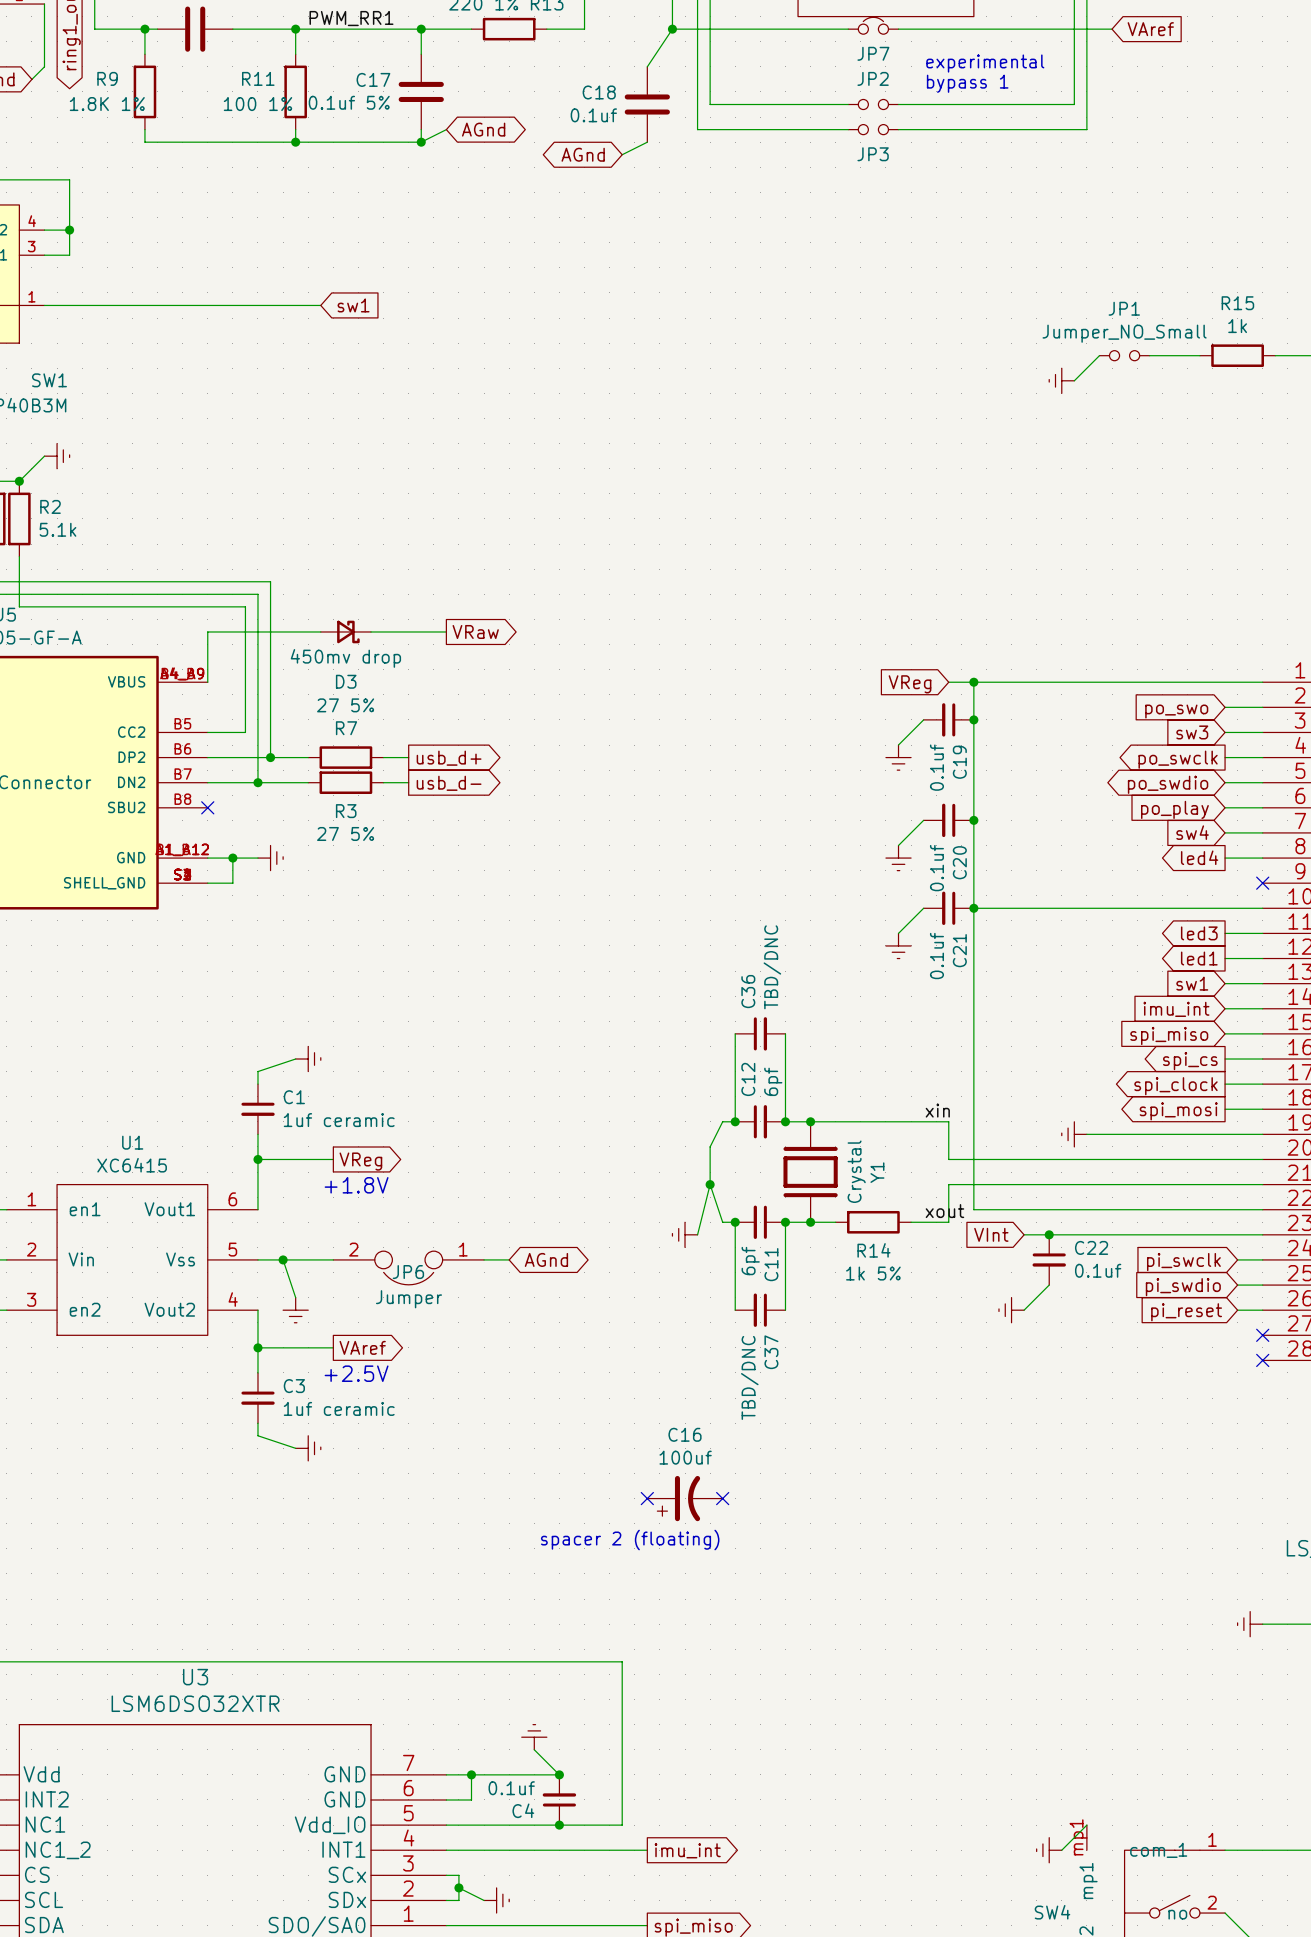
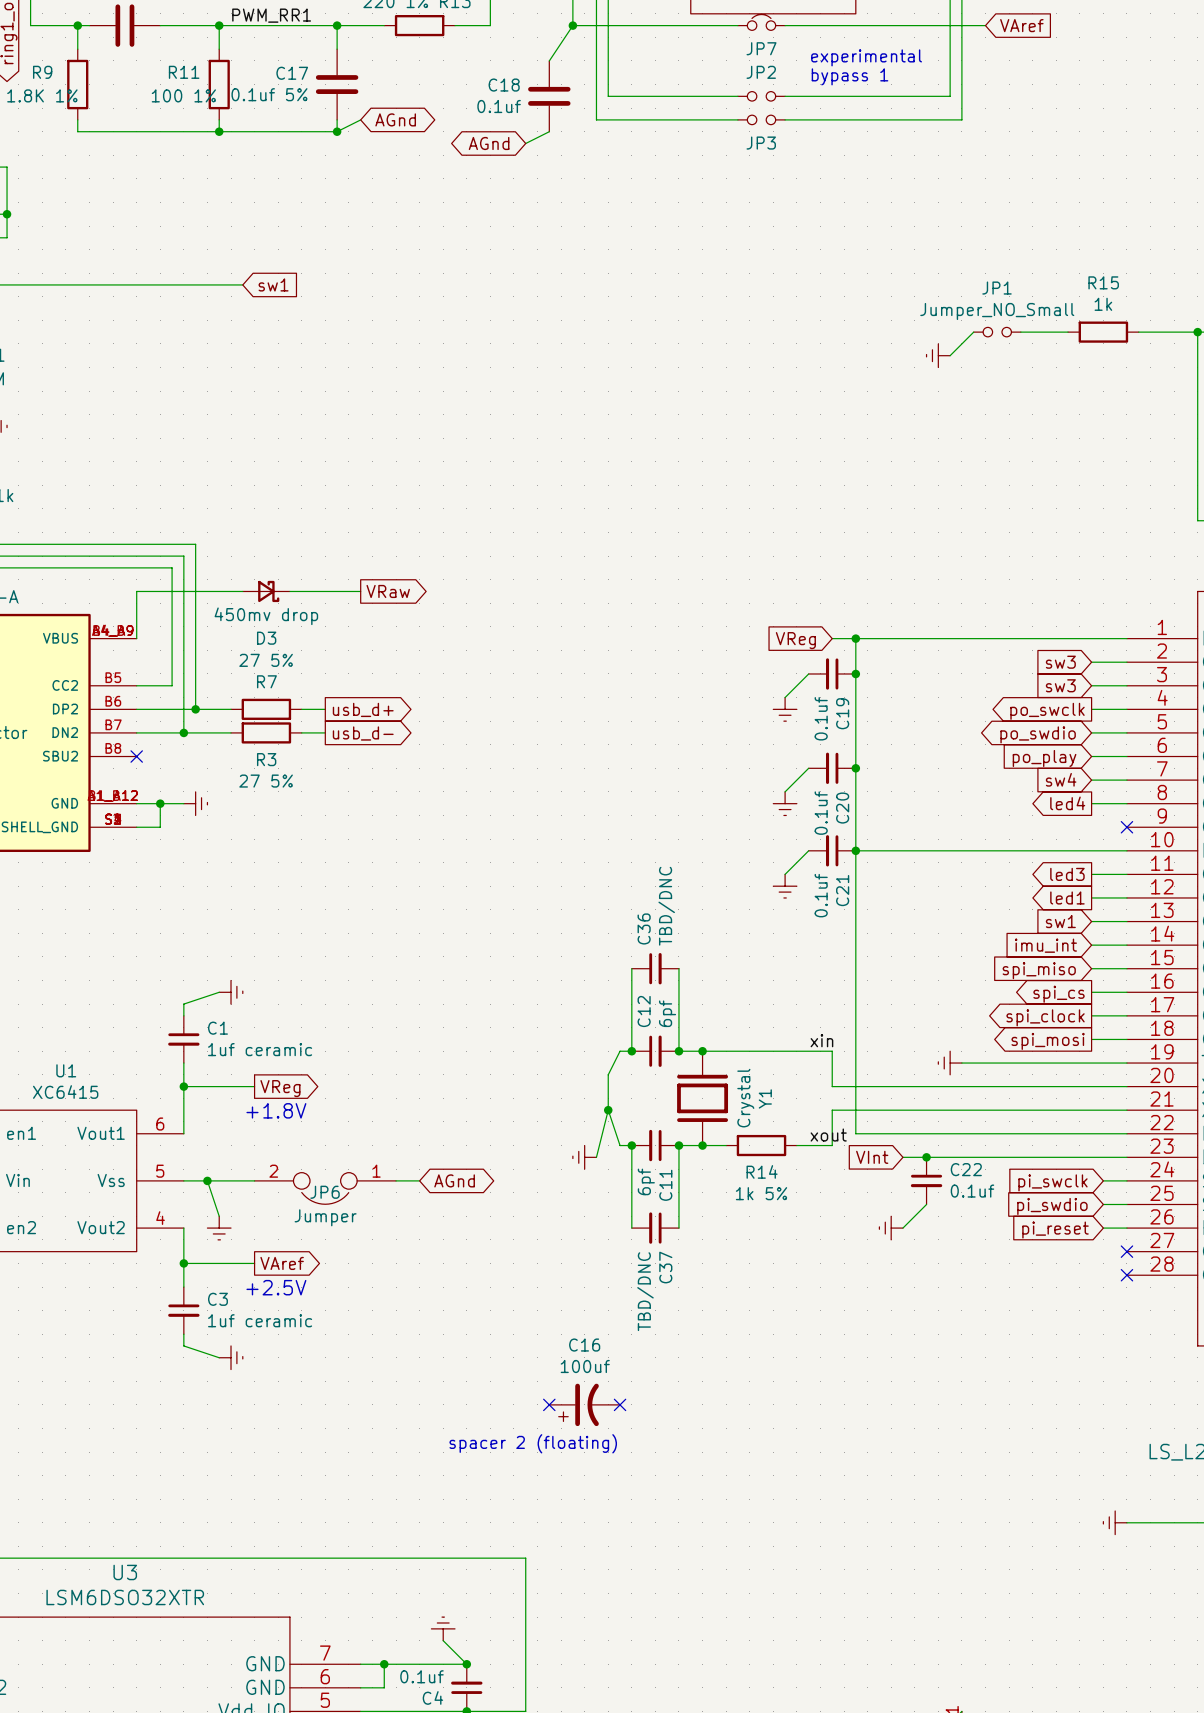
global label: po_swo (1176, 711) -> sw3 (1060, 662)

